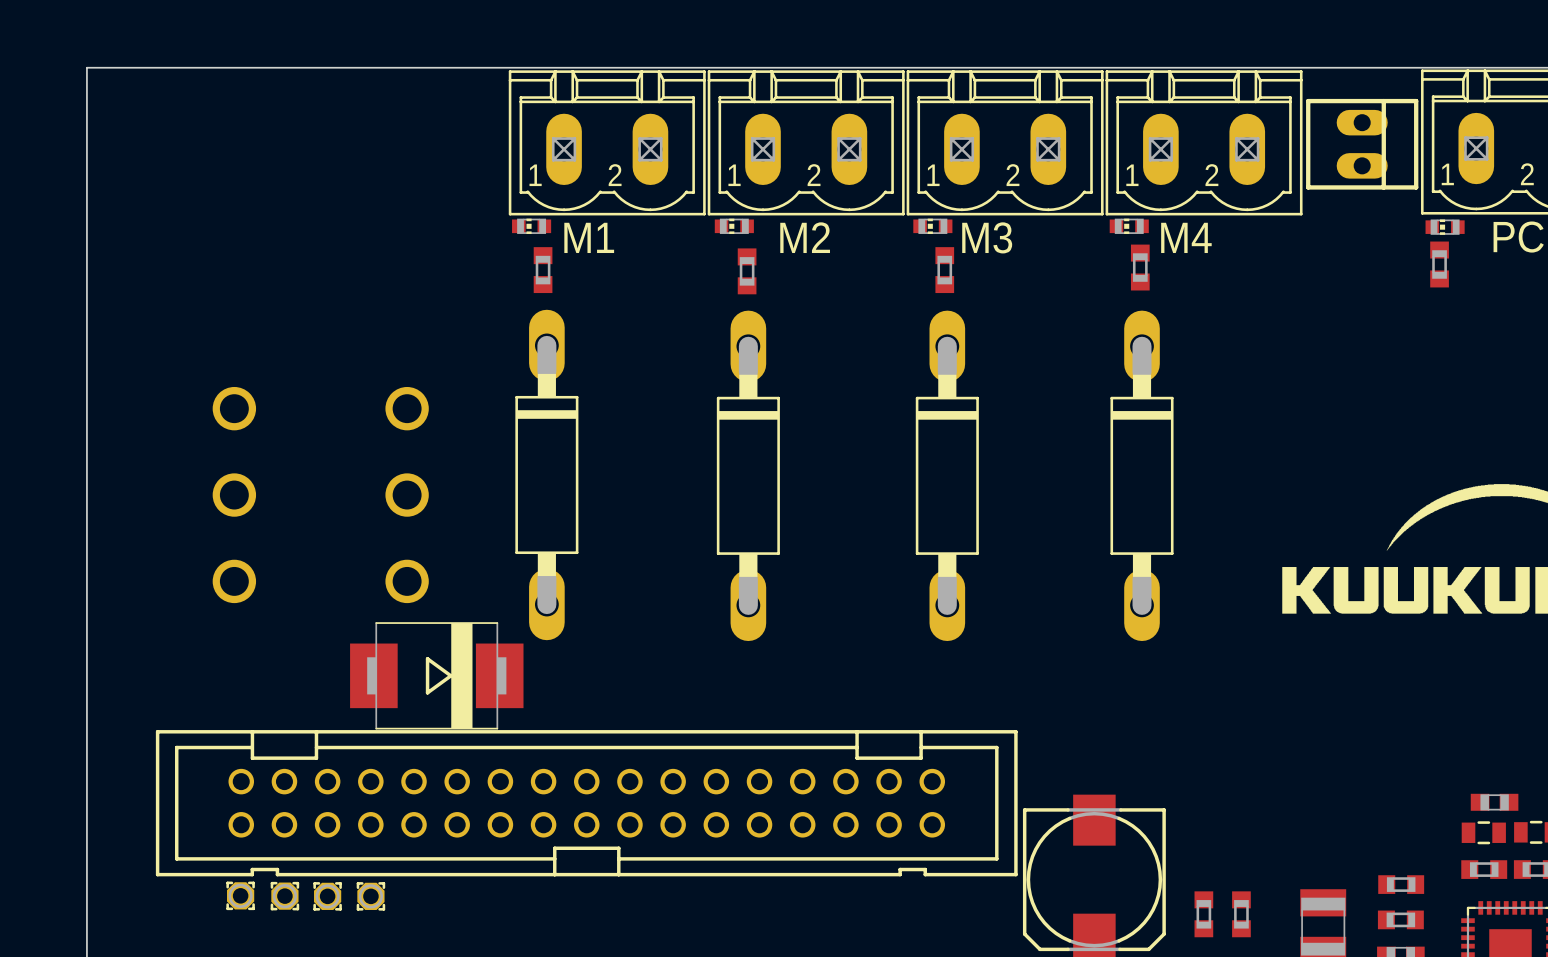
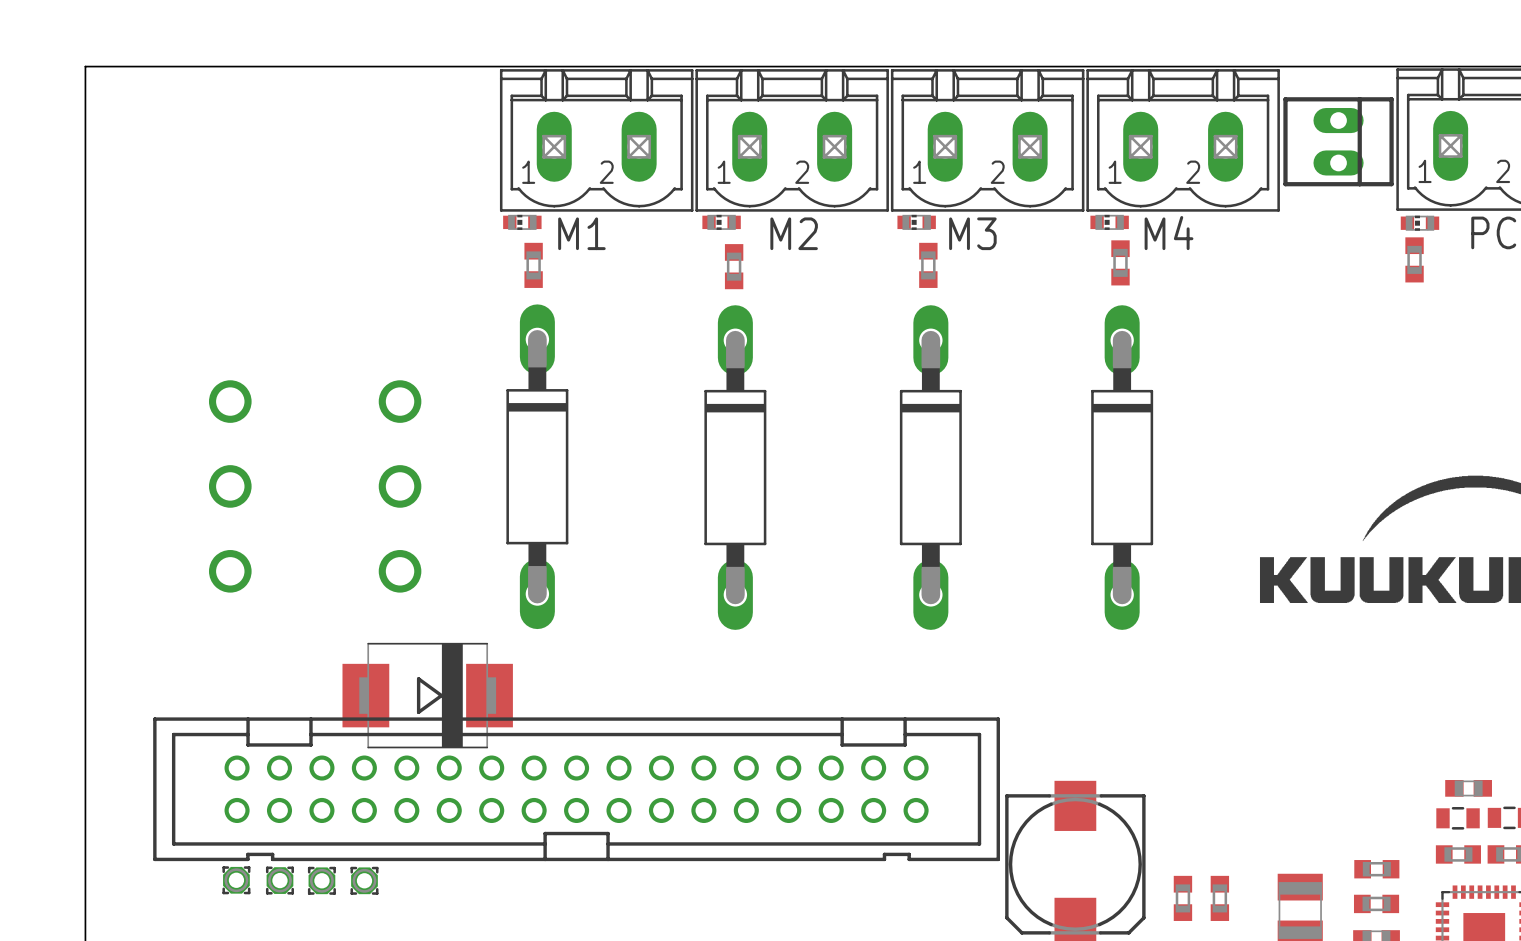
part position: (436, 675) -> (427, 695)

